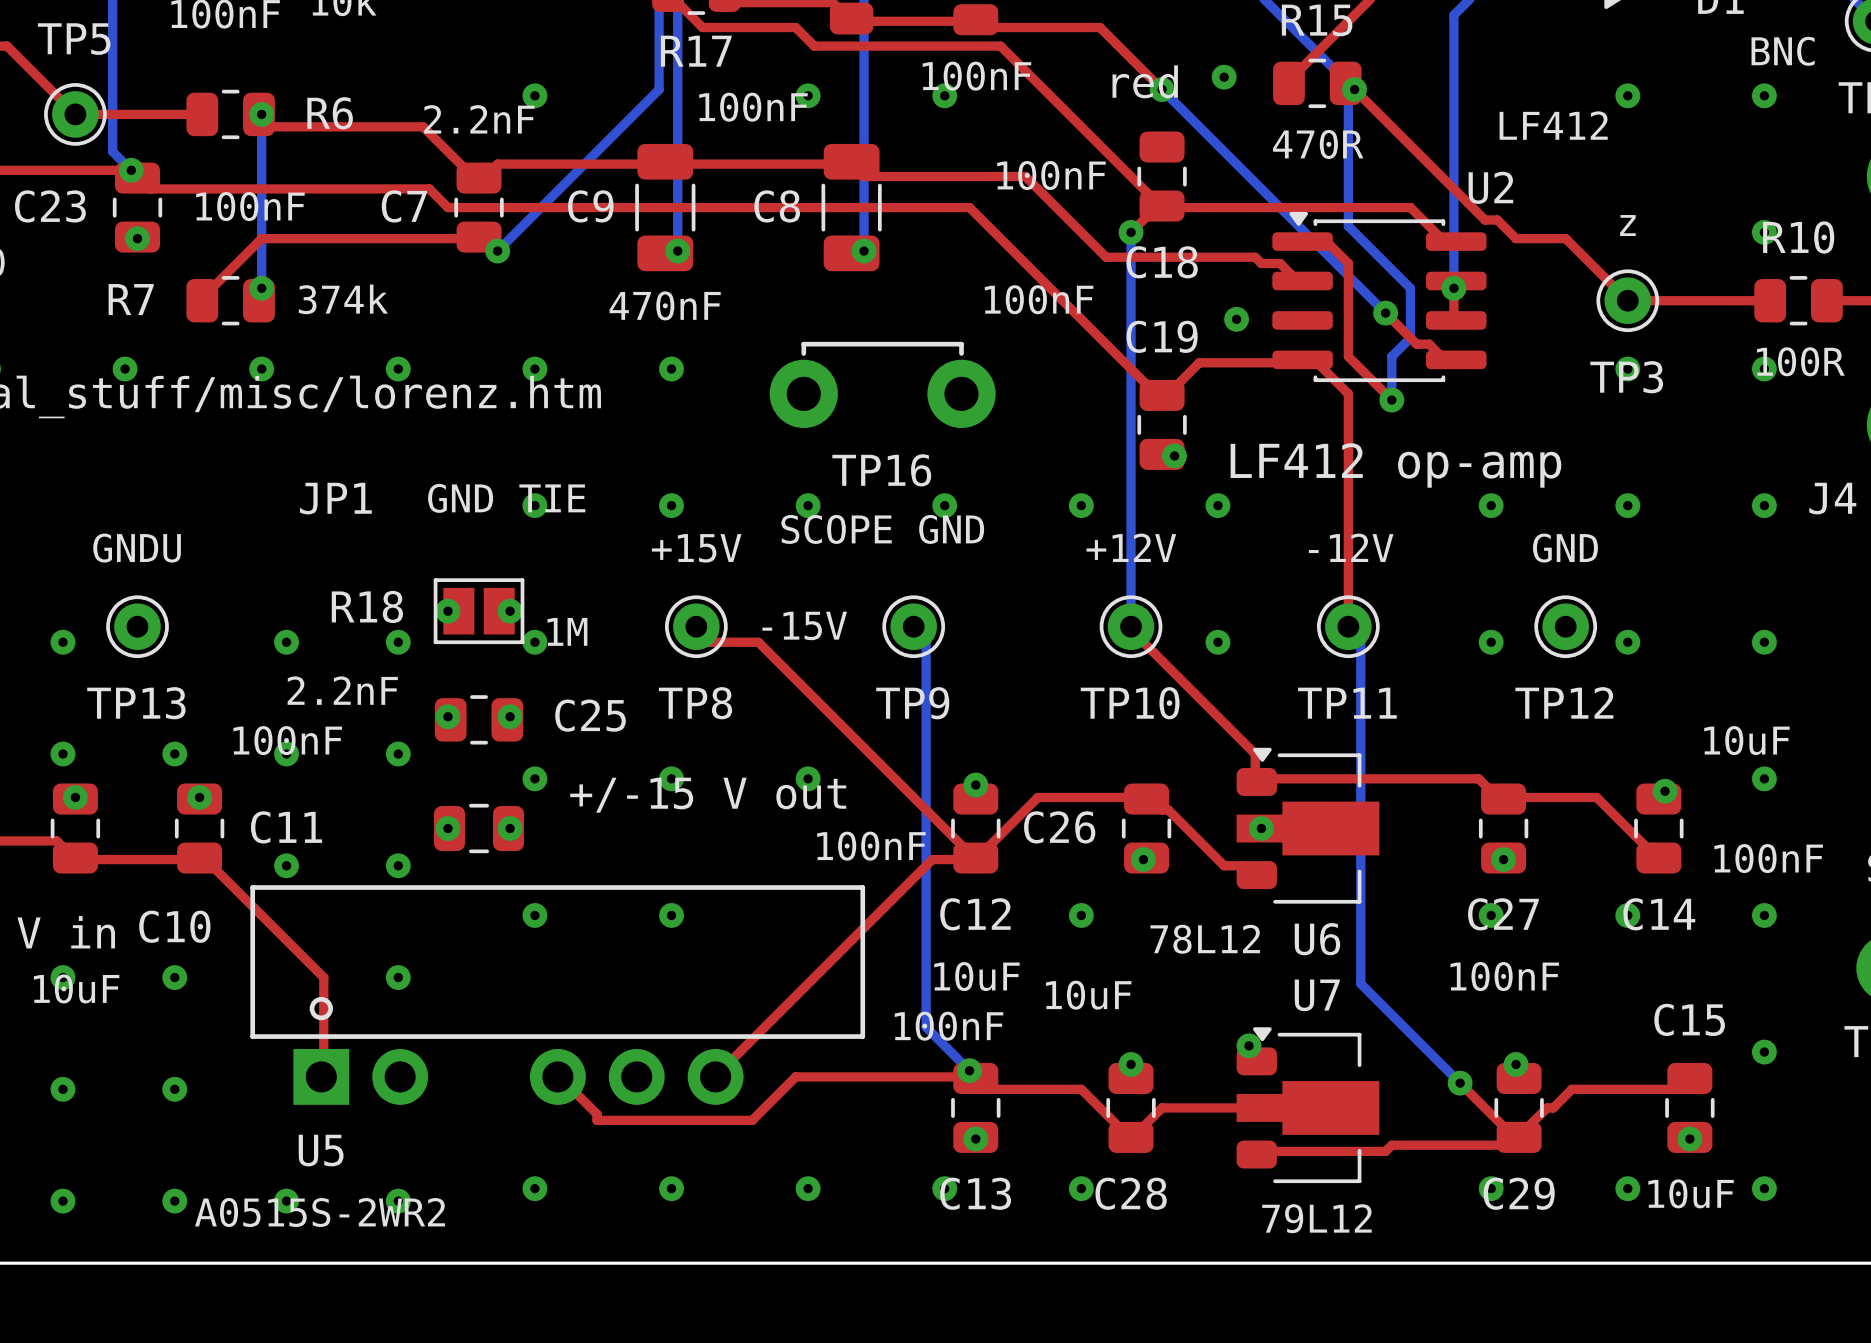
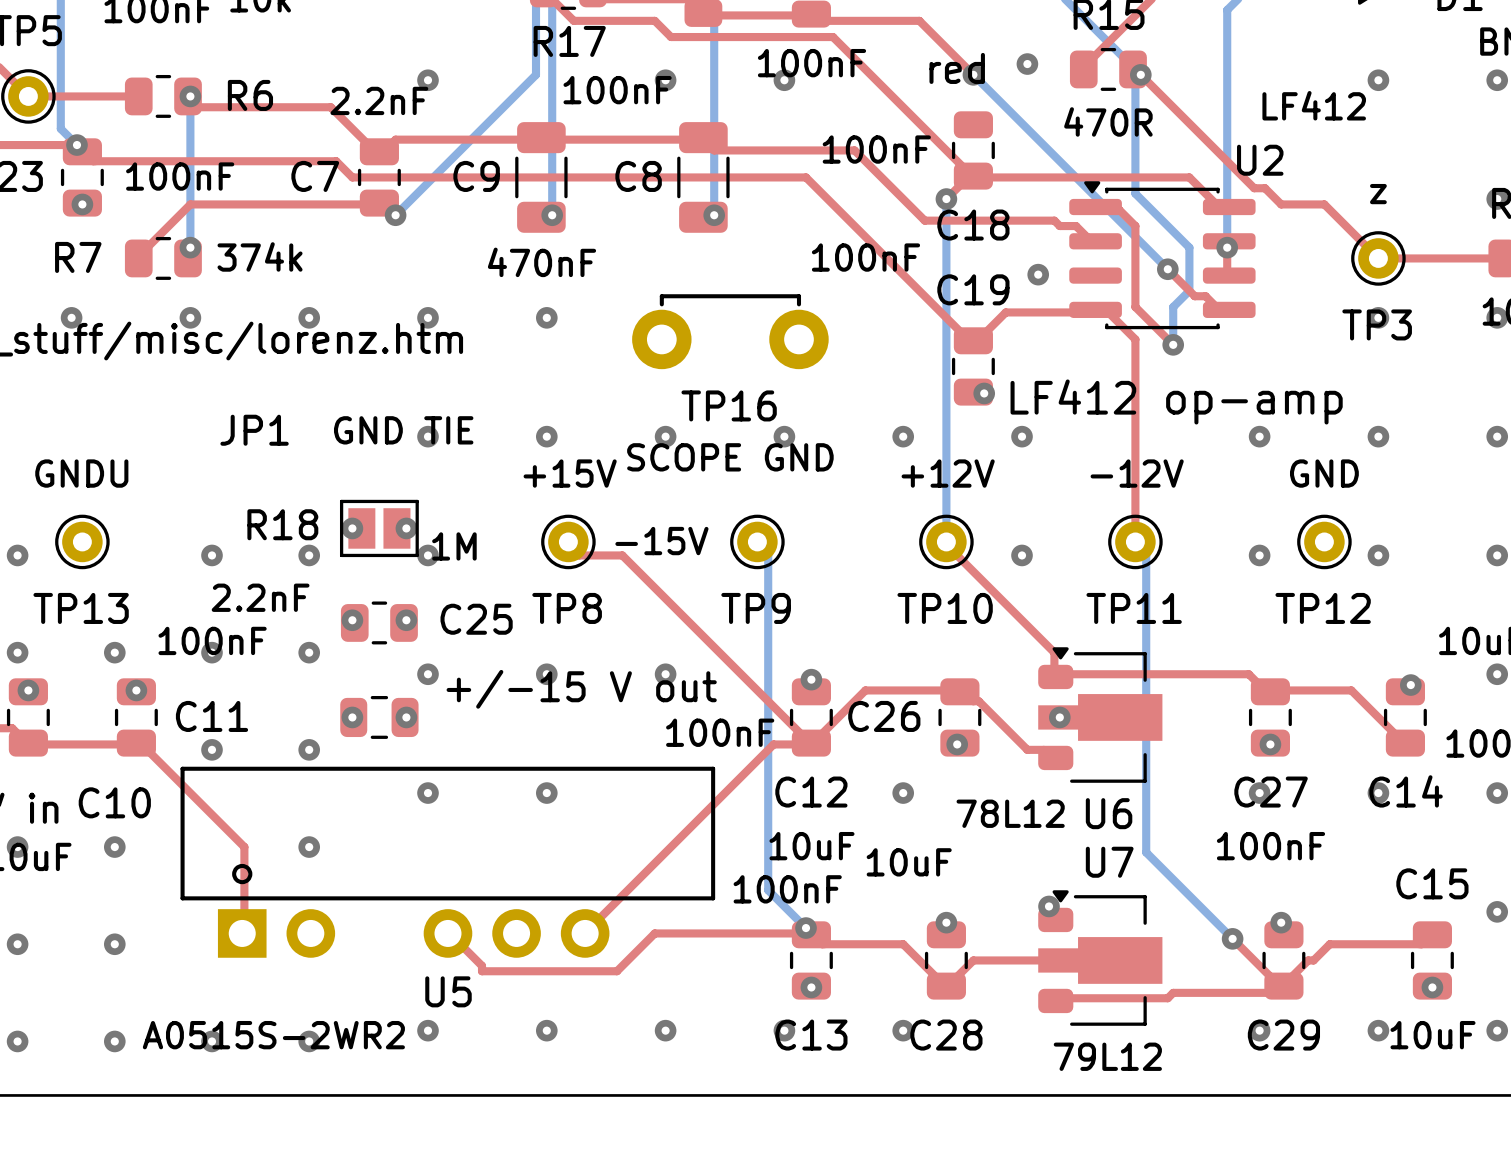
U5 name position: U5 (321, 1150) -> U5 (448, 991)
U5 value position: A0515S-2WR2 (320, 1212) -> A0515S-2WR2 (273, 1035)

